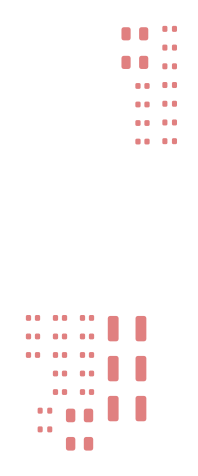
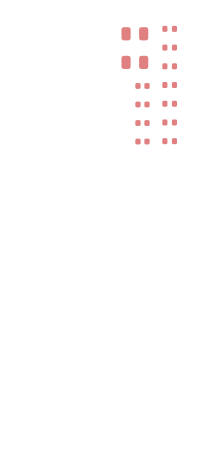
part: (33, 317) -> none
part: (59, 317) -> none
part: (86, 317) -> none
part: (127, 328) -> none
part: (33, 336) -> none
part: (59, 336) -> none
part: (86, 336) -> none
part: (33, 354) -> none
part: (59, 354) -> none
part: (86, 354) -> none
part: (127, 368) -> none
part: (59, 373) -> none
part: (86, 373) -> none
part: (59, 392) -> none
part: (86, 392) -> none
part: (127, 408) -> none
part: (44, 410) -> none
part: (79, 415) -> none
part: (44, 429) -> none
part: (79, 443) -> none

